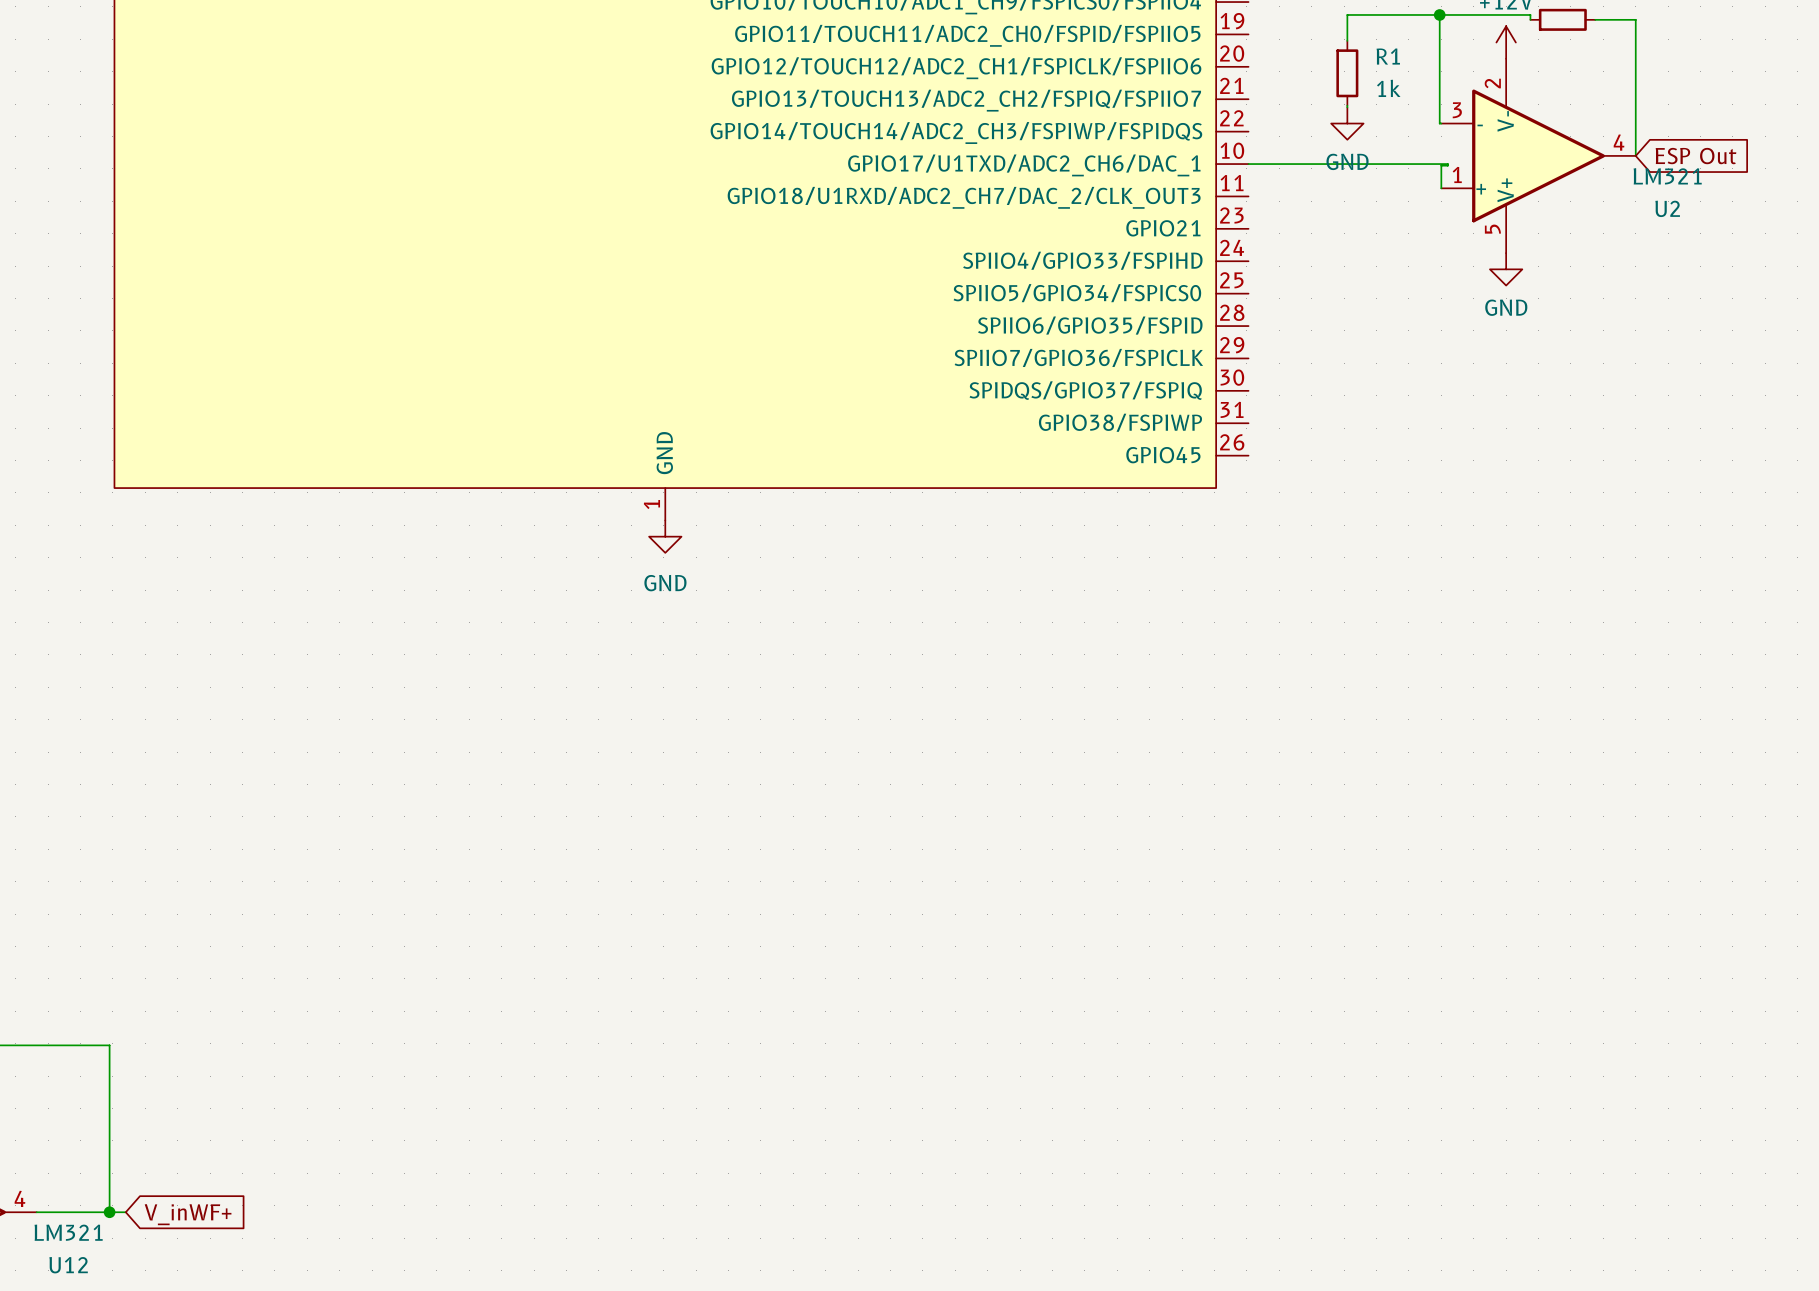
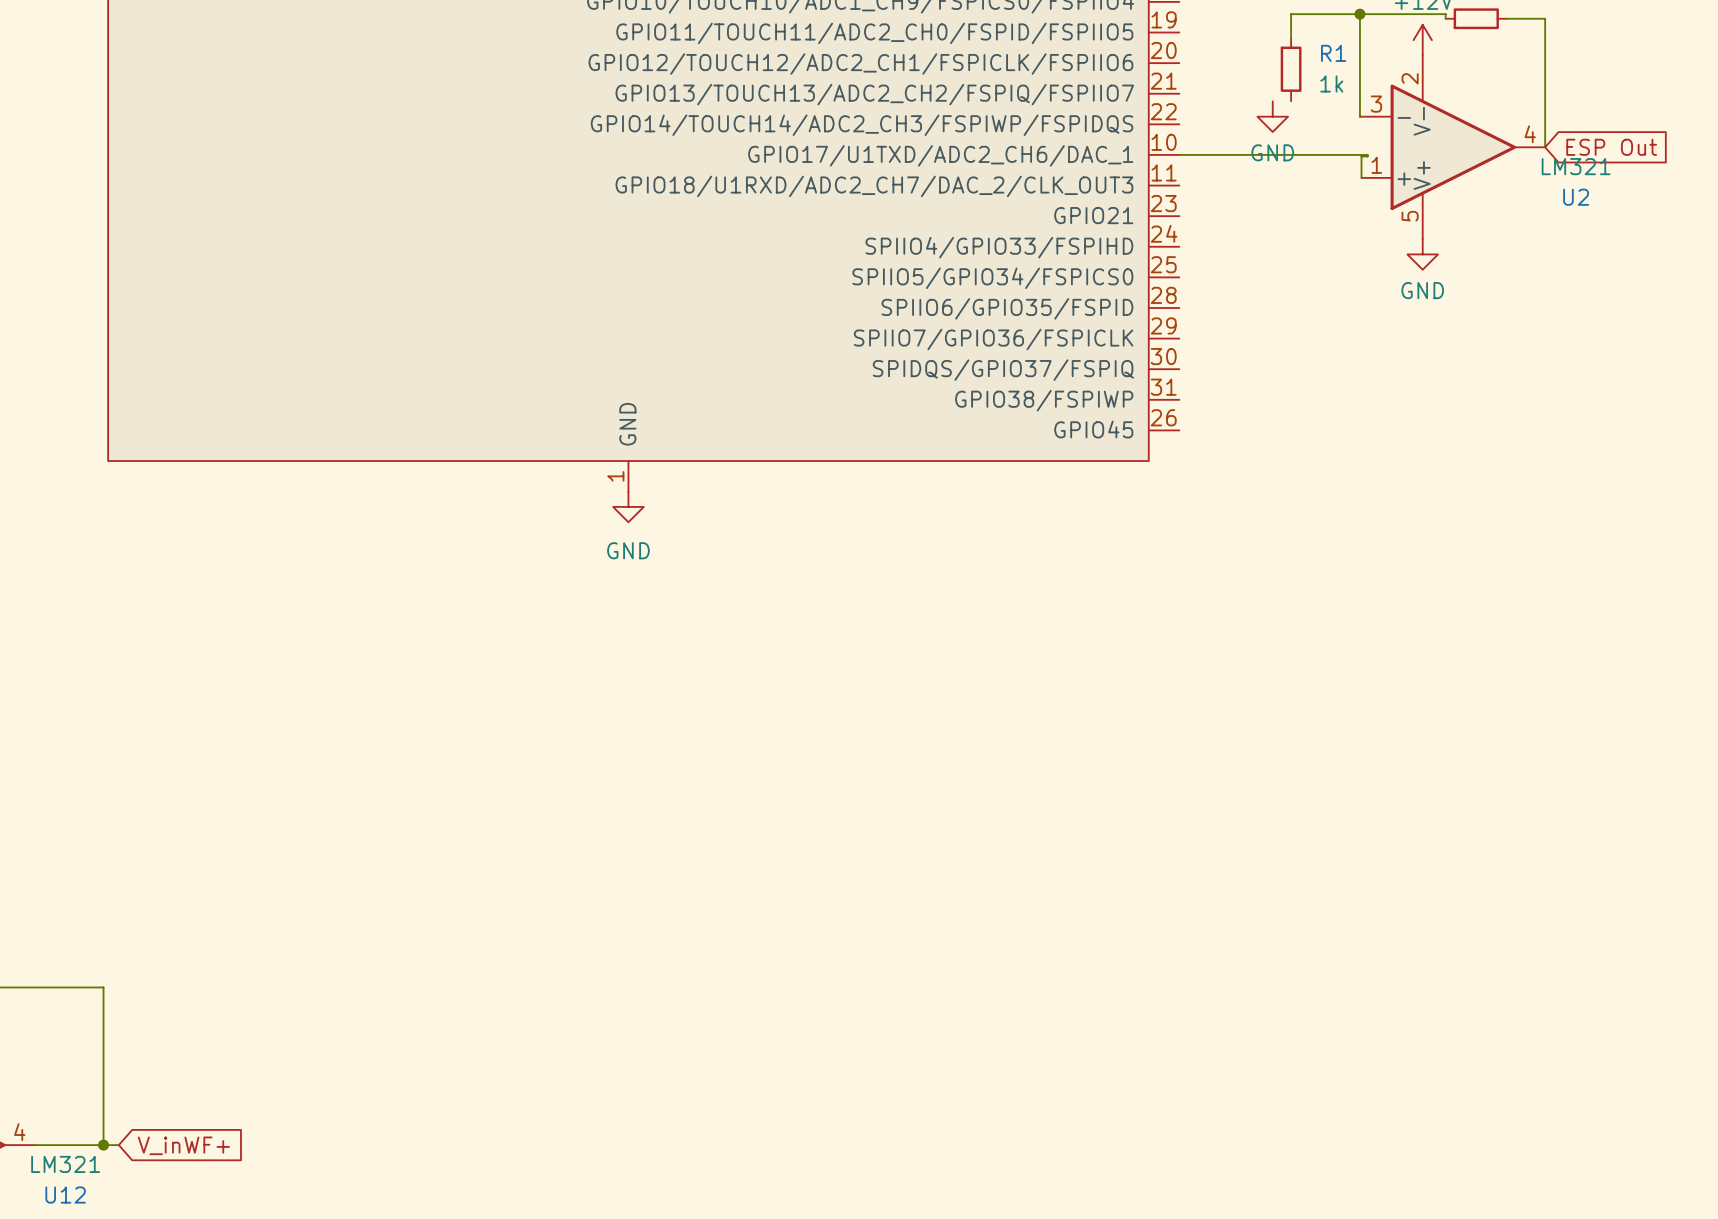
wire: (1366, 14) (1347, 14) (1347, 40) -> (1291, 14) (1291, 38)
R1 position: (1347, 73) -> (1291, 69)
wire: (1347, 105) (1347, 107) -> (1291, 99) (1291, 101)

